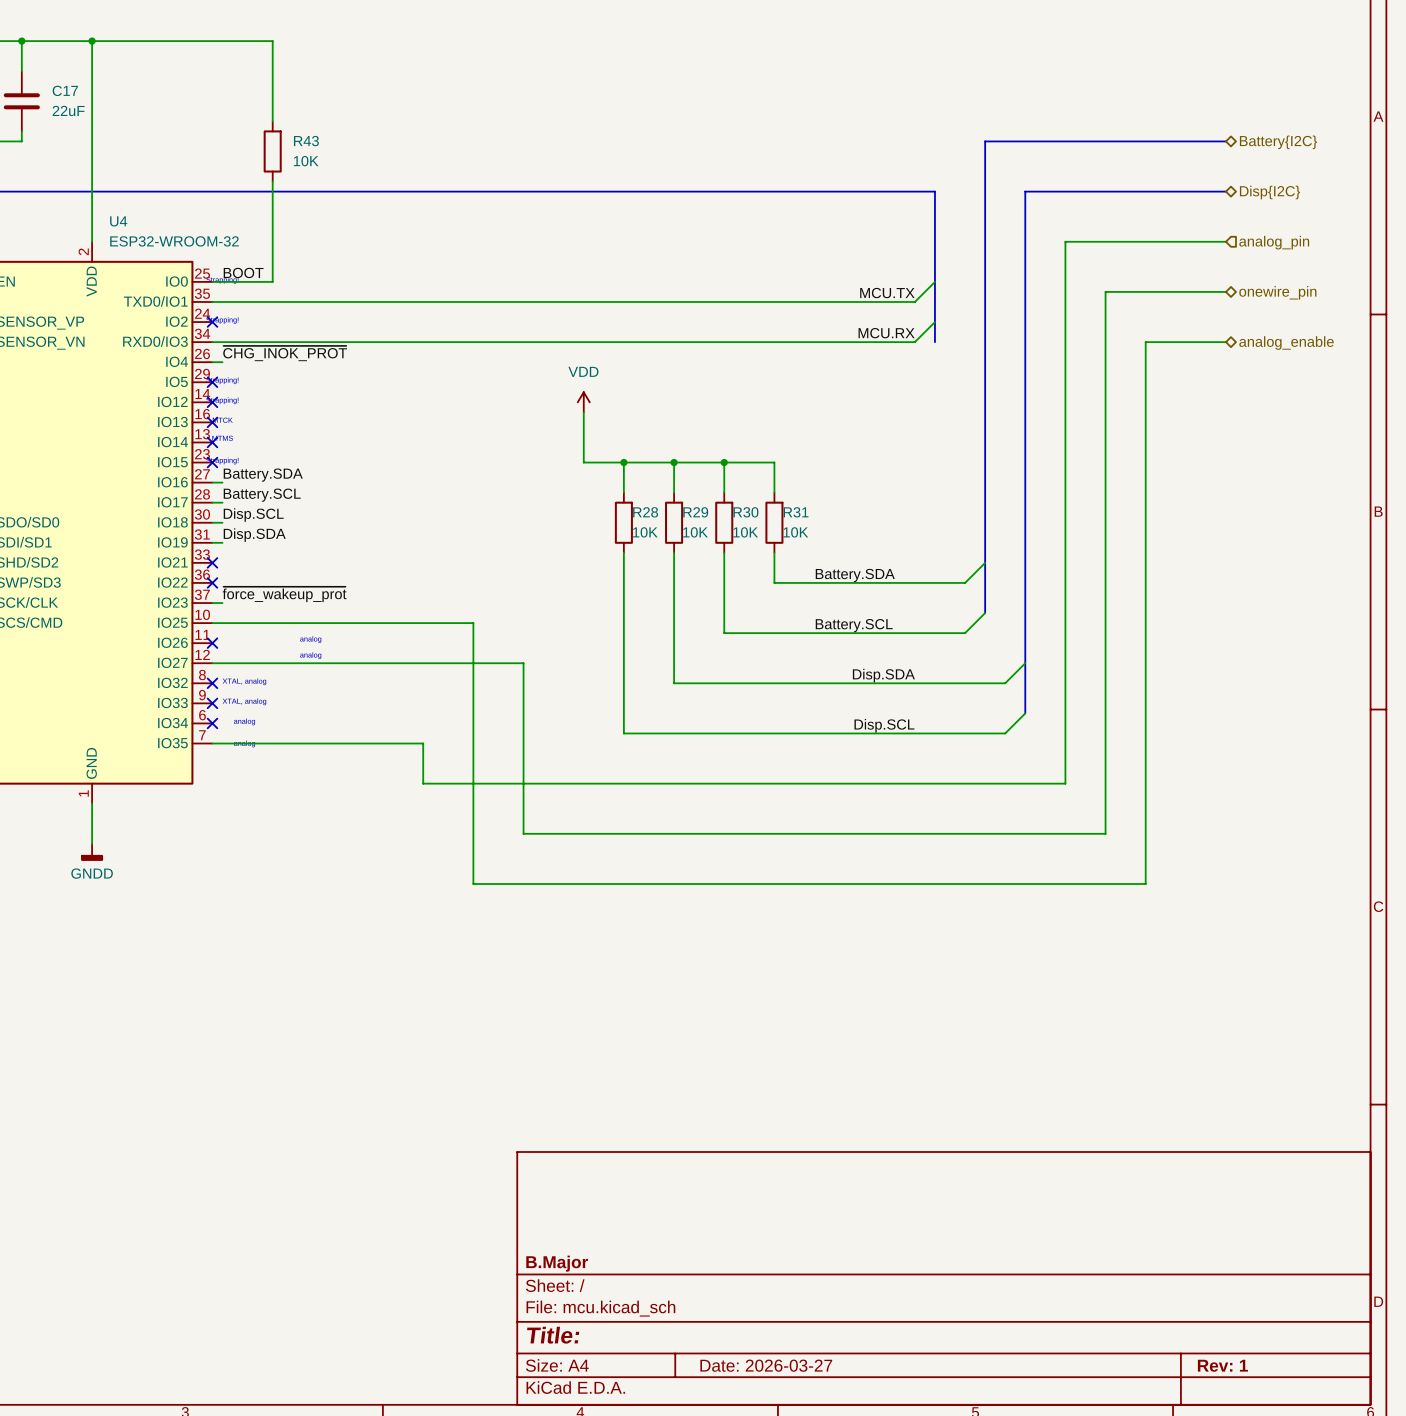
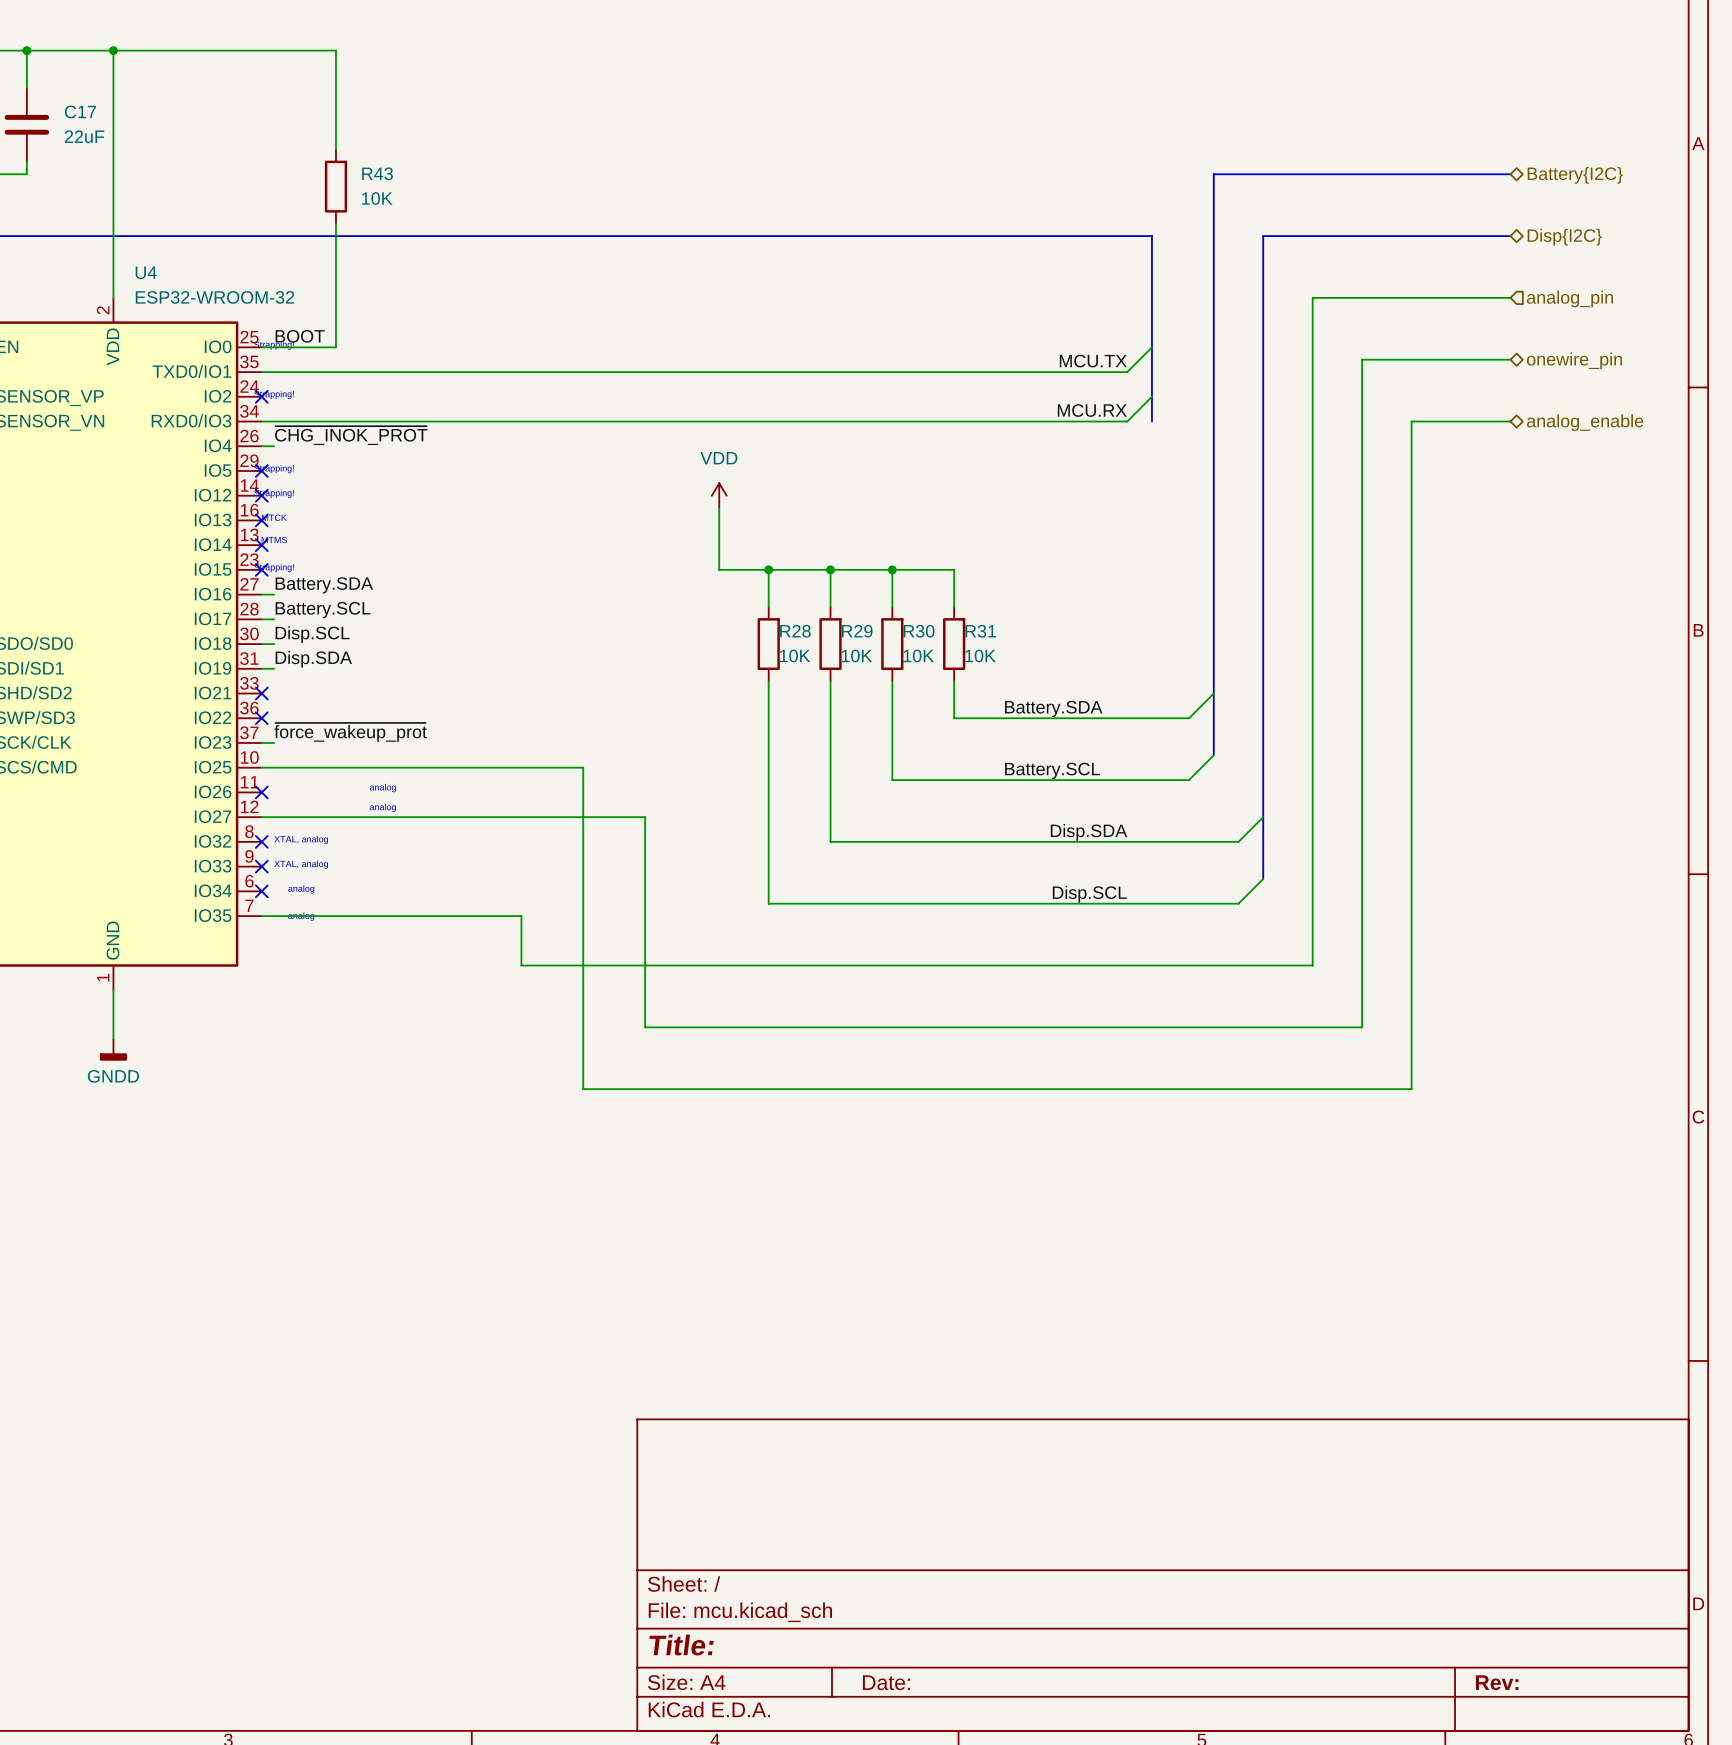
title block: B.Major (557, 1263) -> none
title block: Date: 2026-03-27 (766, 1365) -> Date: (886, 1682)
title block: Rev: 1 (1222, 1365) -> Rev: (1497, 1682)

